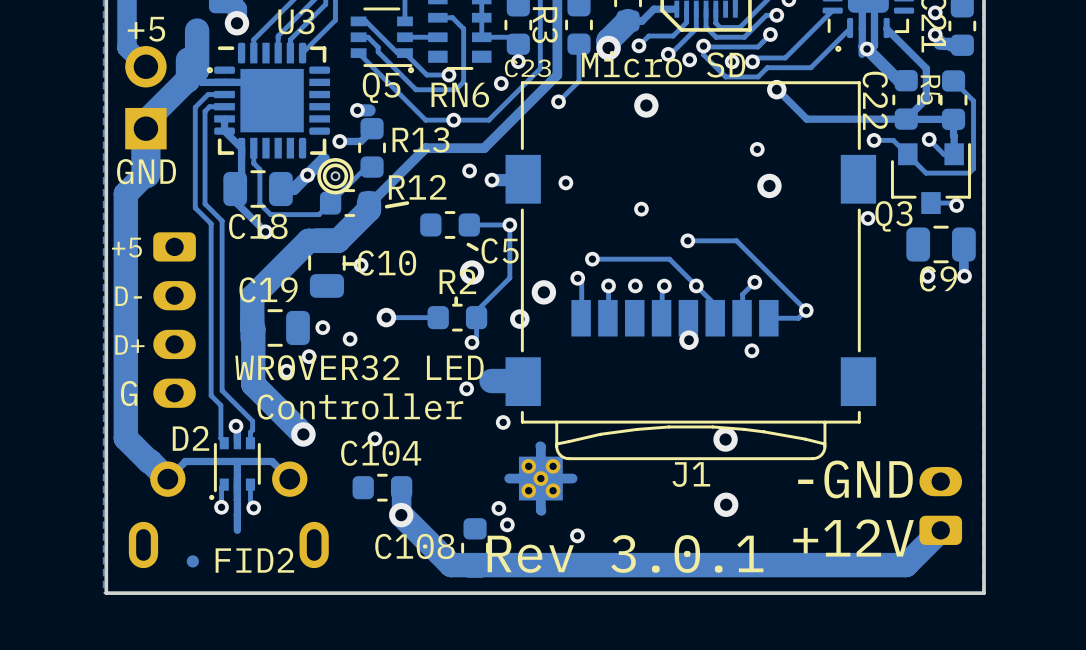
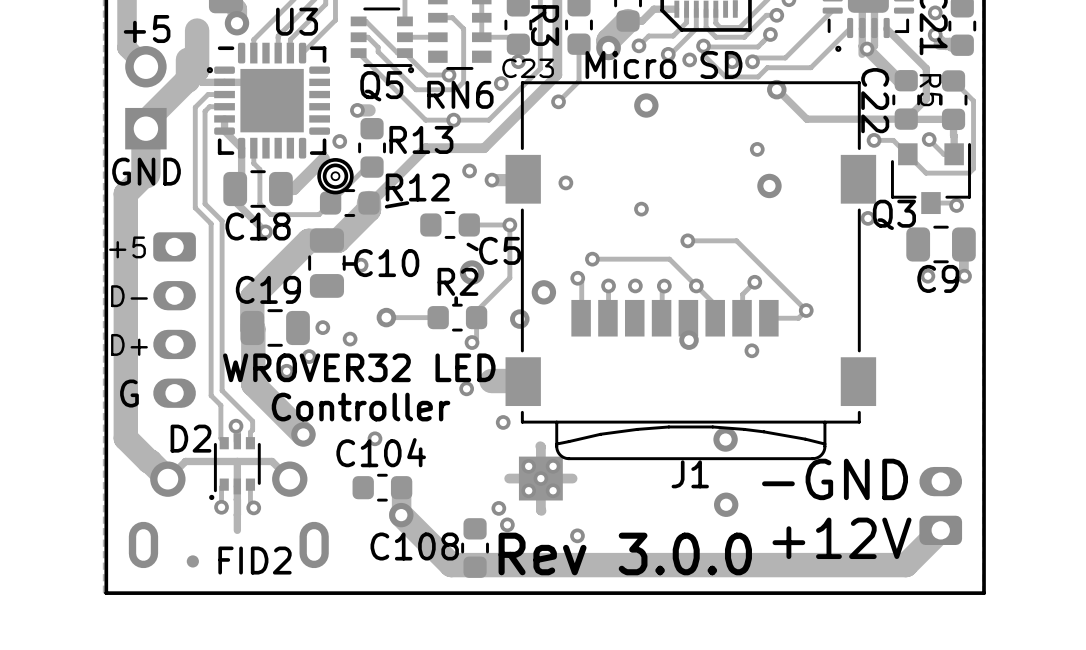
track: (373, 129) (360, 141) (339, 141) -> none
via: (307, 175) -> none
text: Rev 3.0.1 (625, 553) -> Rev 3.0.0 (625, 553)

